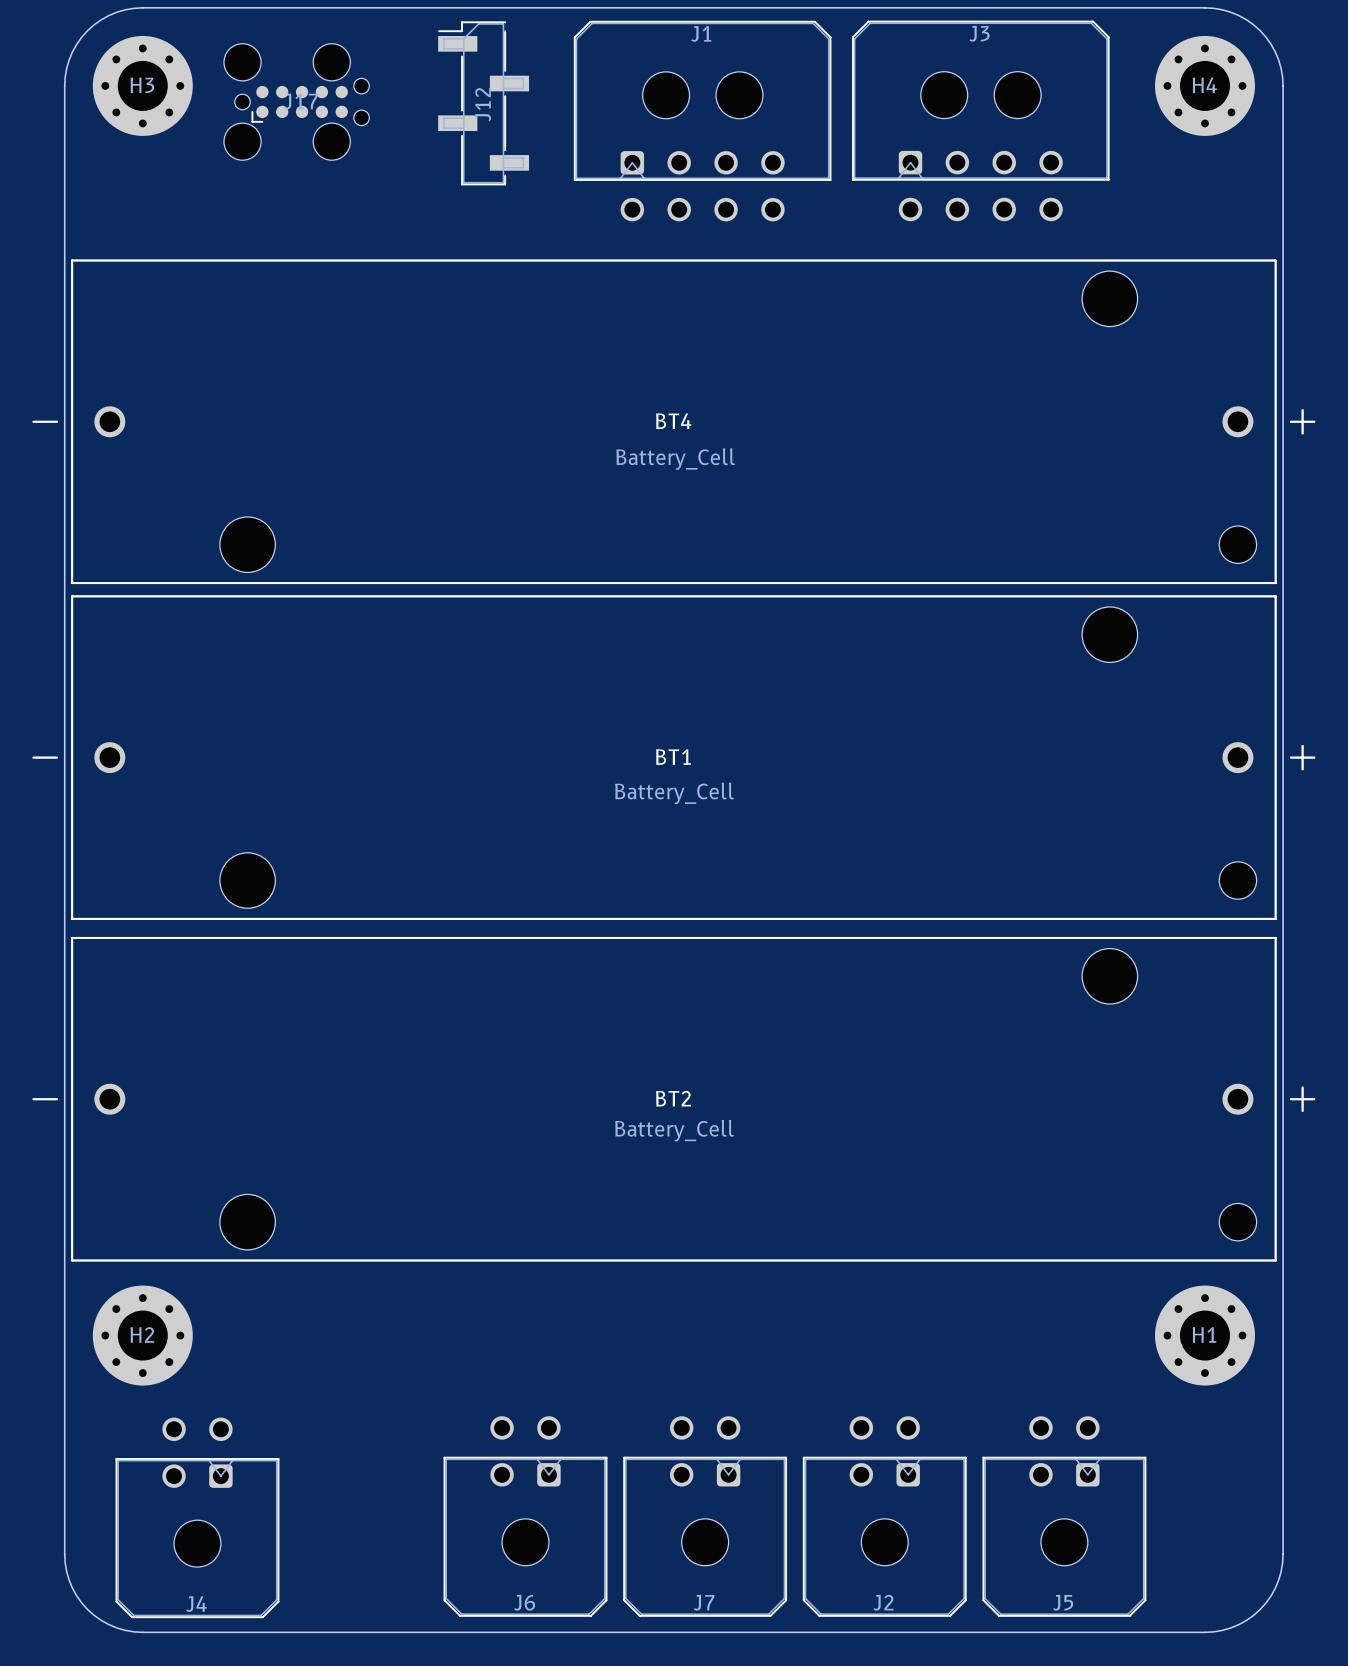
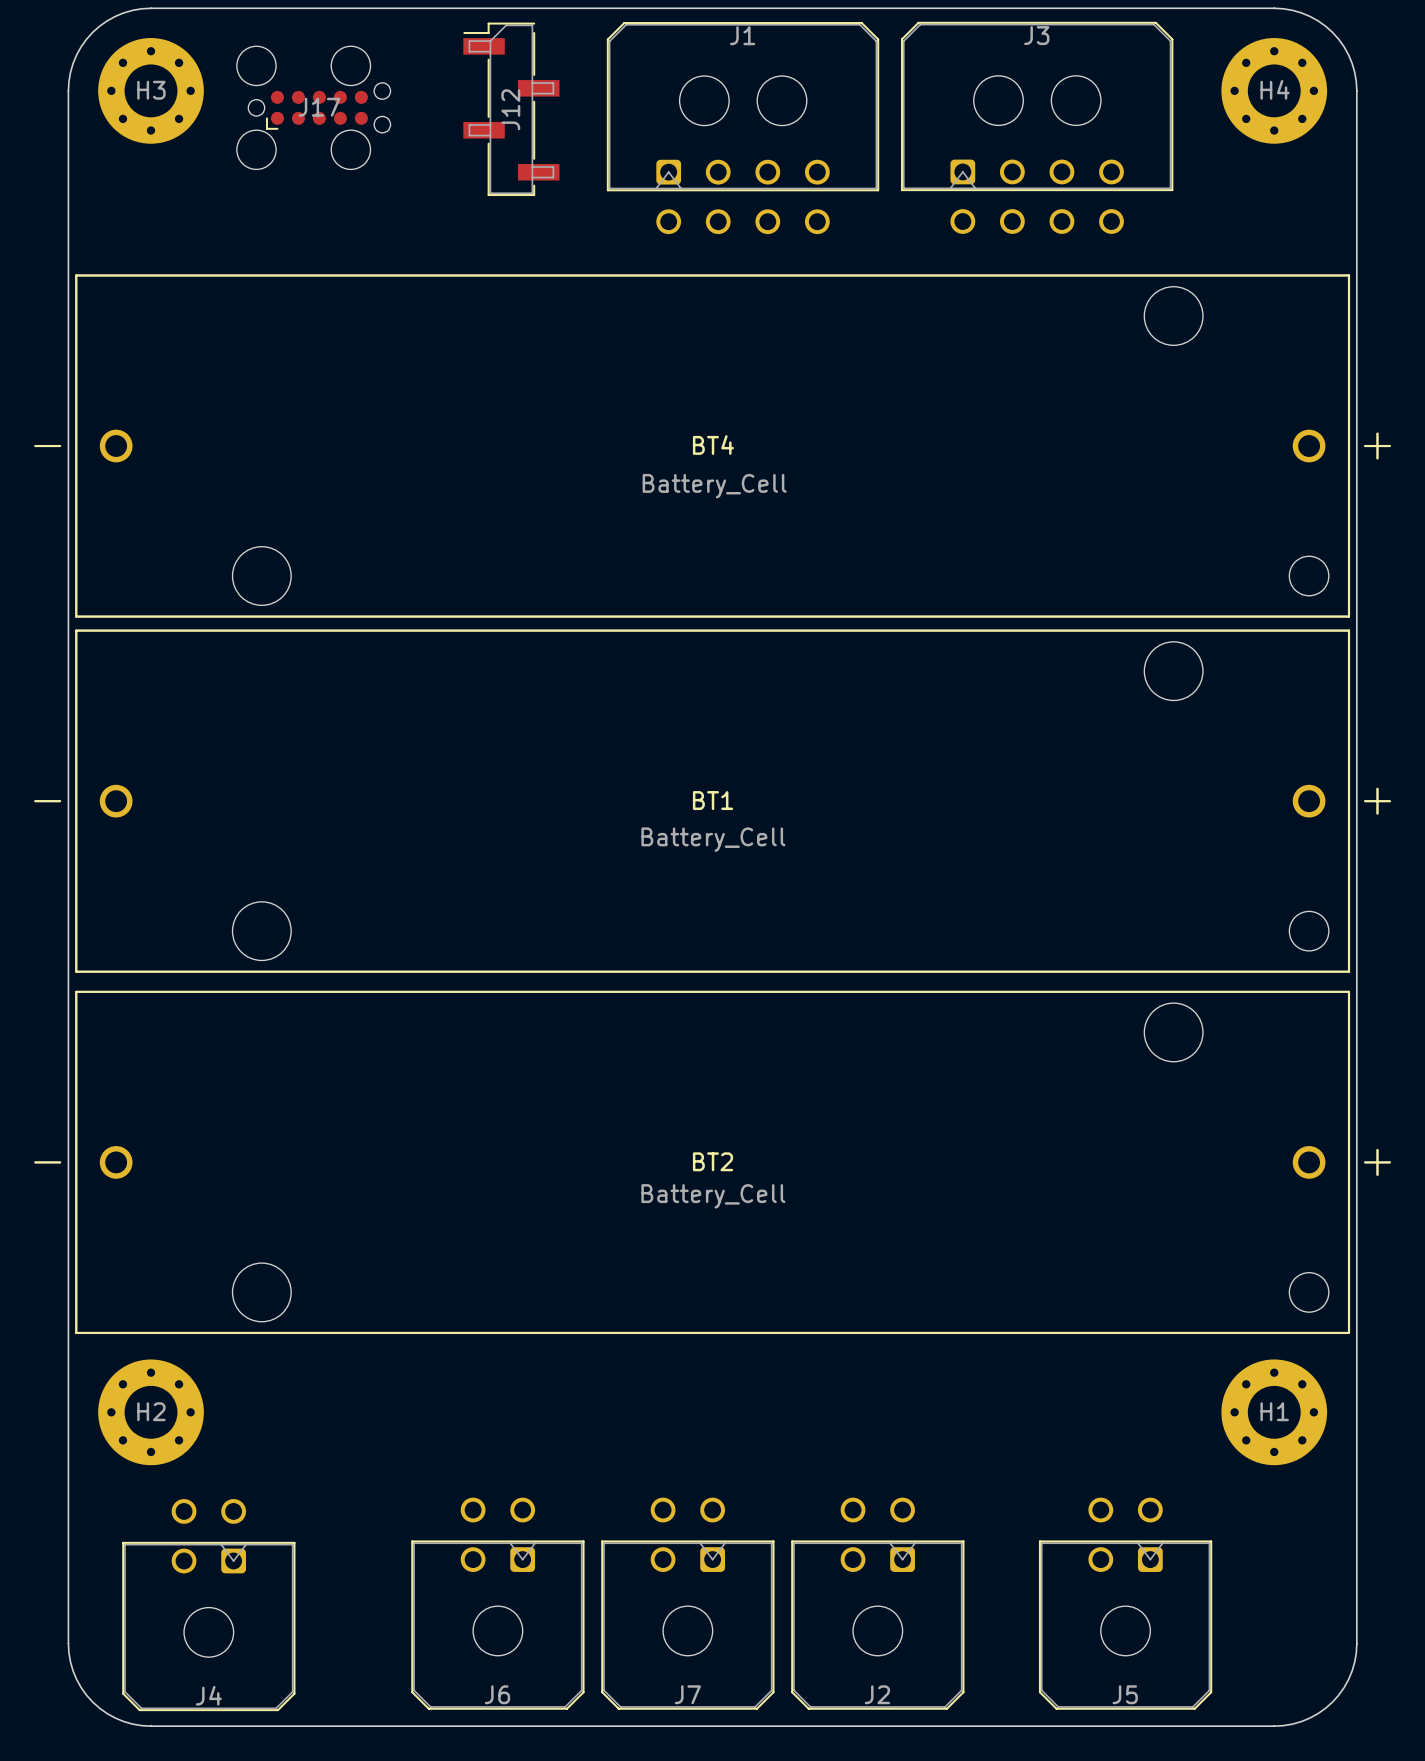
J6 position: (525, 1516) -> (497, 1603)
J7 position: (705, 1516) -> (687, 1603)
J2 position: (884, 1516) -> (877, 1603)

